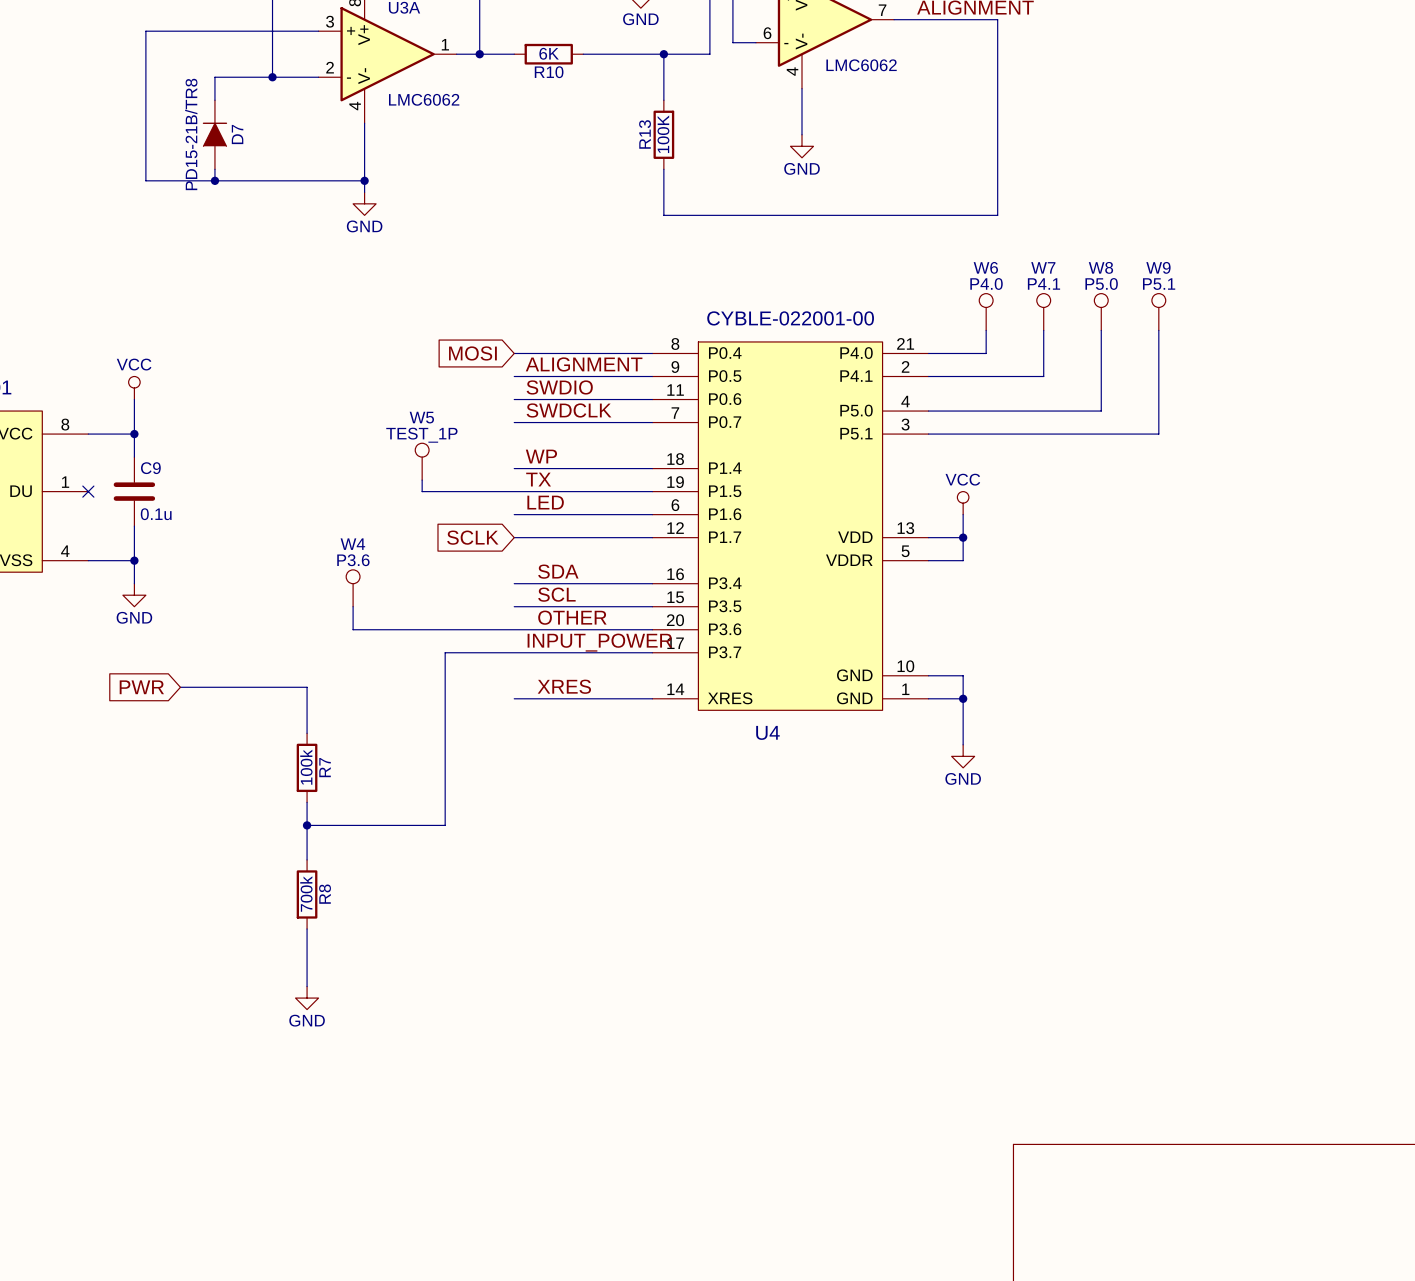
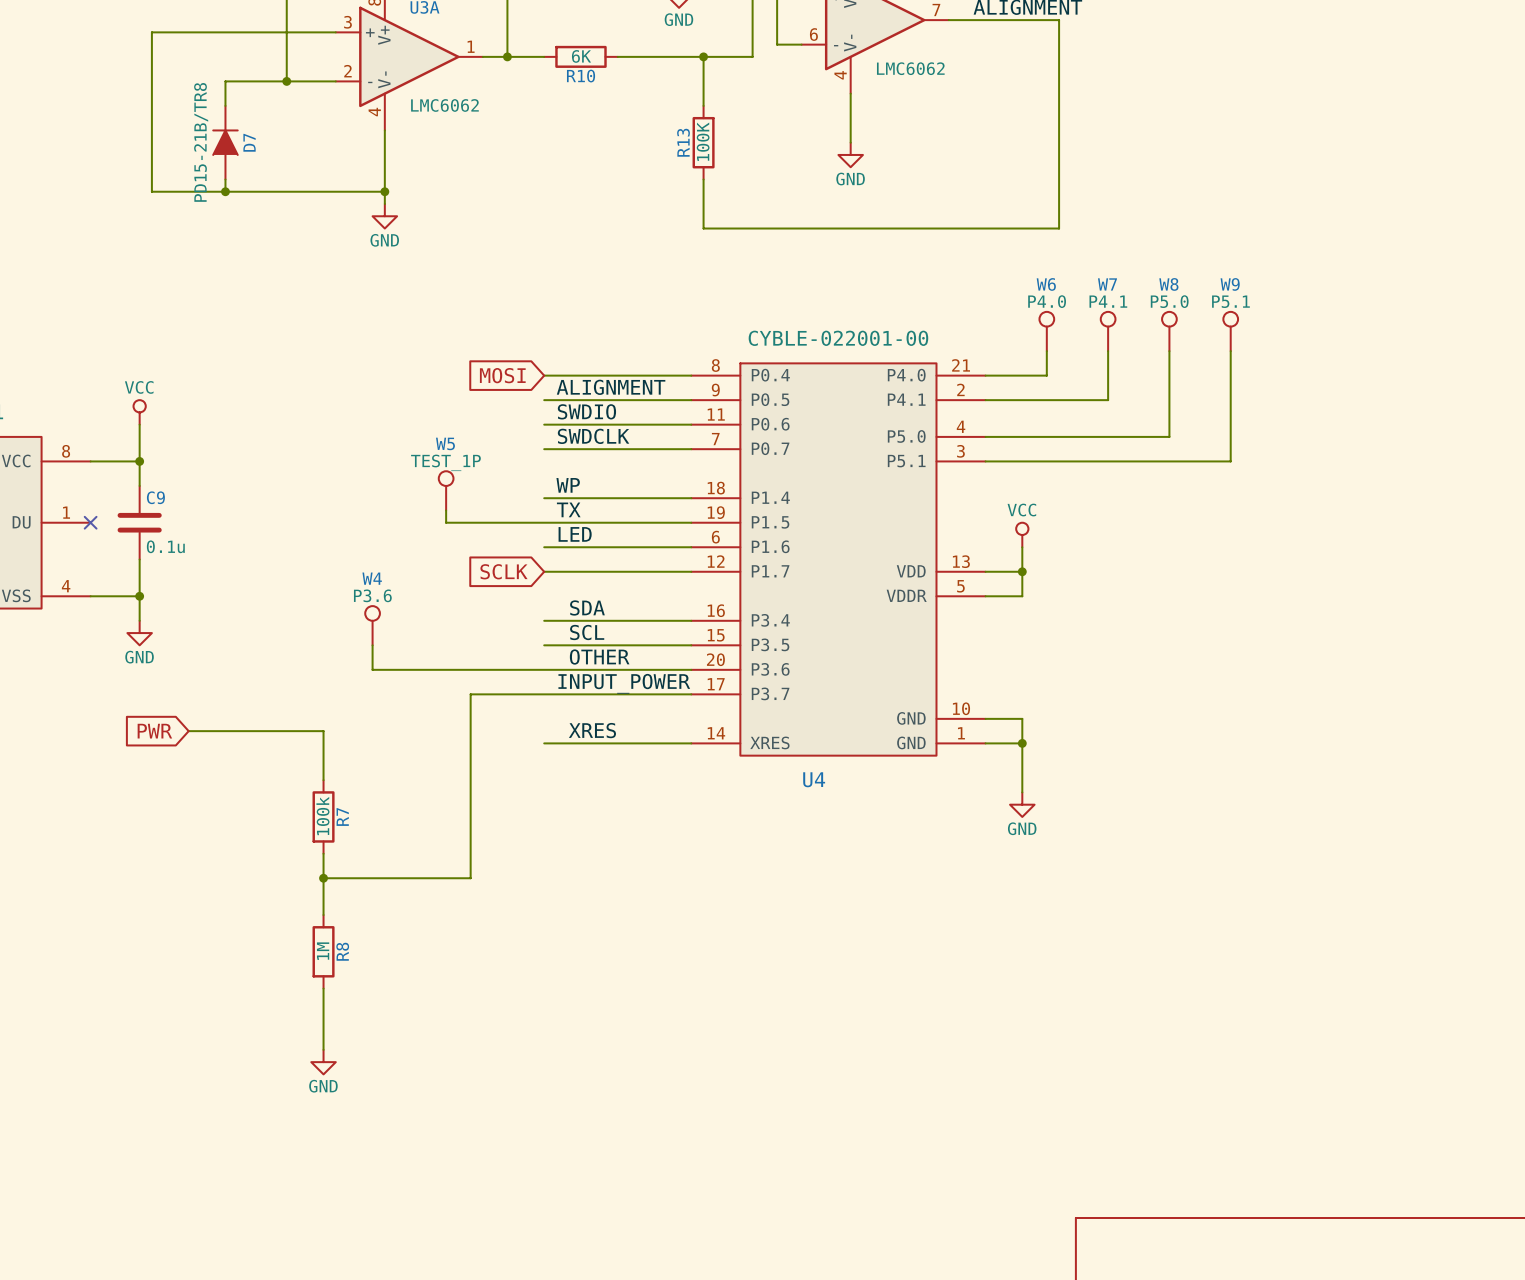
R8 value: 700k (306, 894) -> 1M (323, 951)

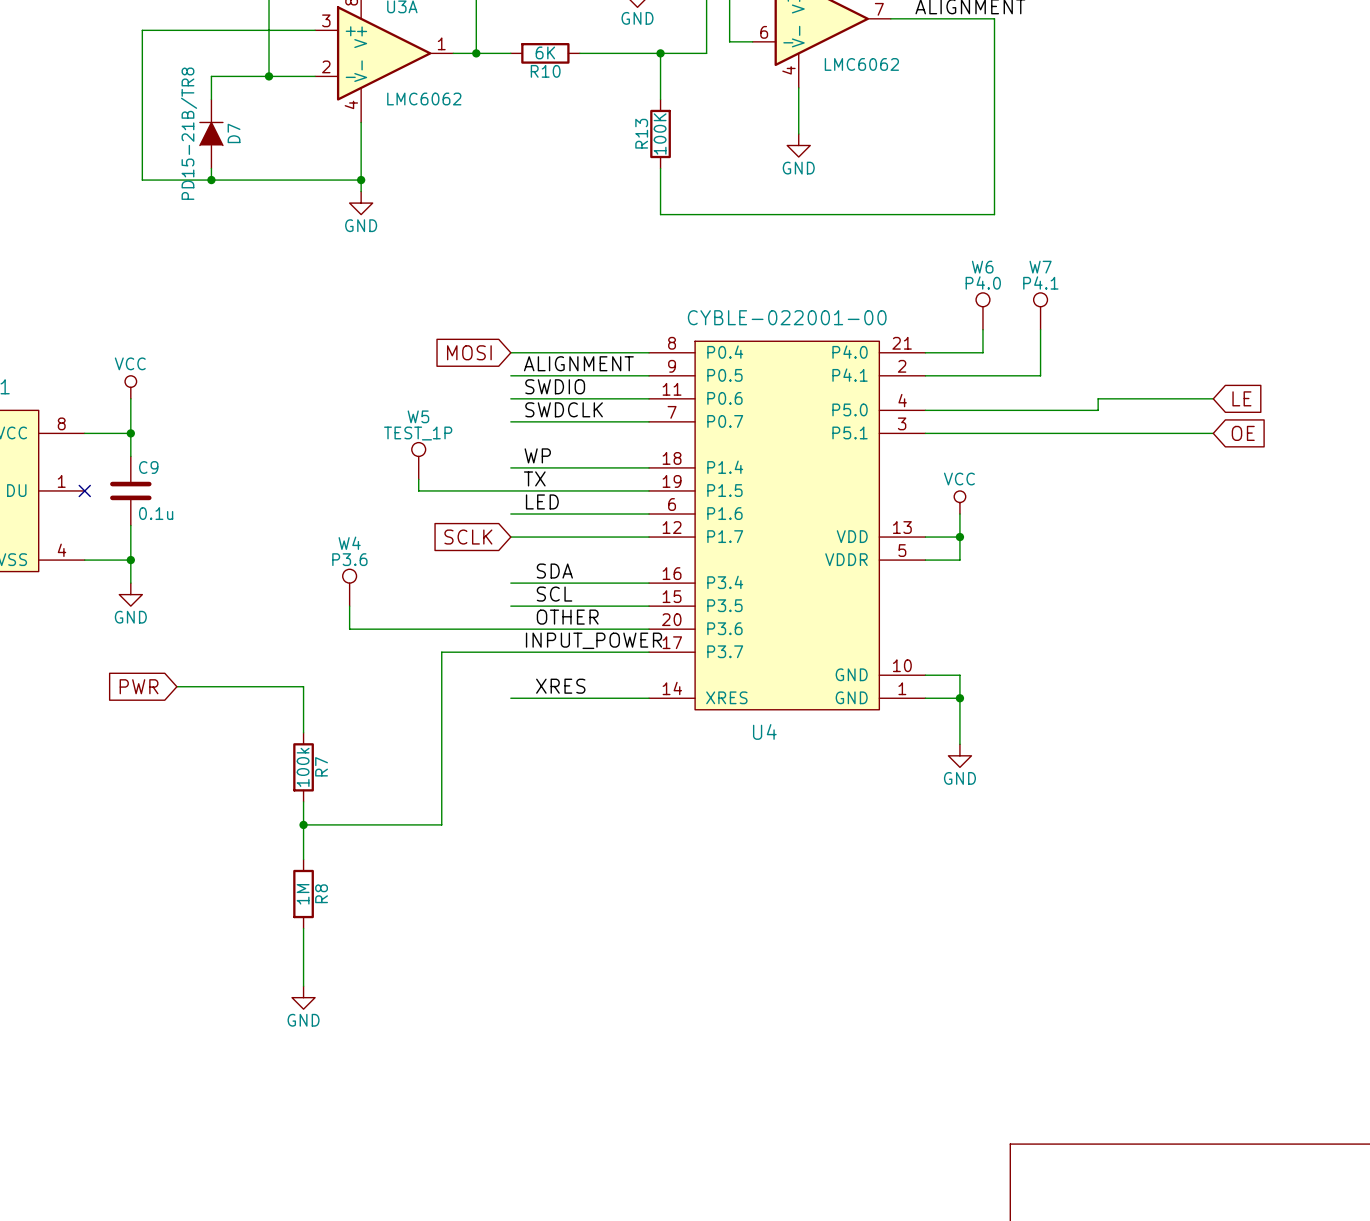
W8: P5.0 (1169, 331) -> none
W9: P5.1 (1230, 331) -> none
wire: (1169, 351) (1169, 424) -> (1213, 398) (1098, 398)
wire: (1230, 351) (1230, 461) -> (1213, 433) (1155, 433)
global label: none -> LE (1241, 398)
global label: none -> OE (1243, 433)

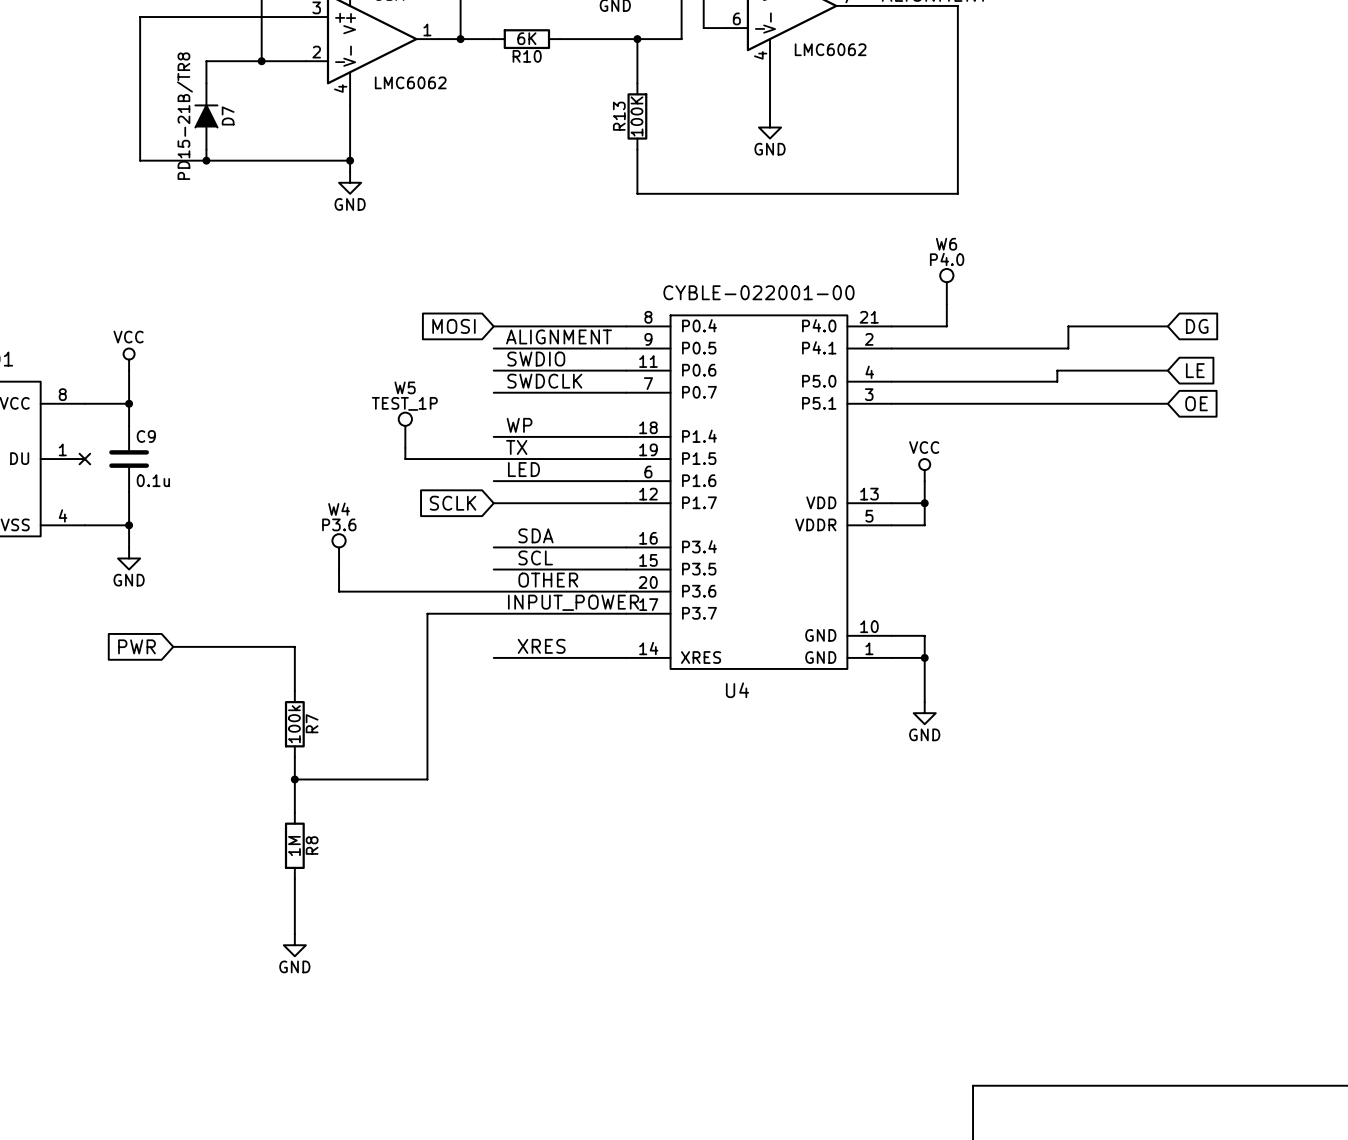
W7: P4.1 (1040, 311) -> none
wire: (1040, 329) (1040, 375) -> (1167, 326) (1068, 326) (1068, 348) (1002, 348)
global label: none -> DG (1197, 326)

